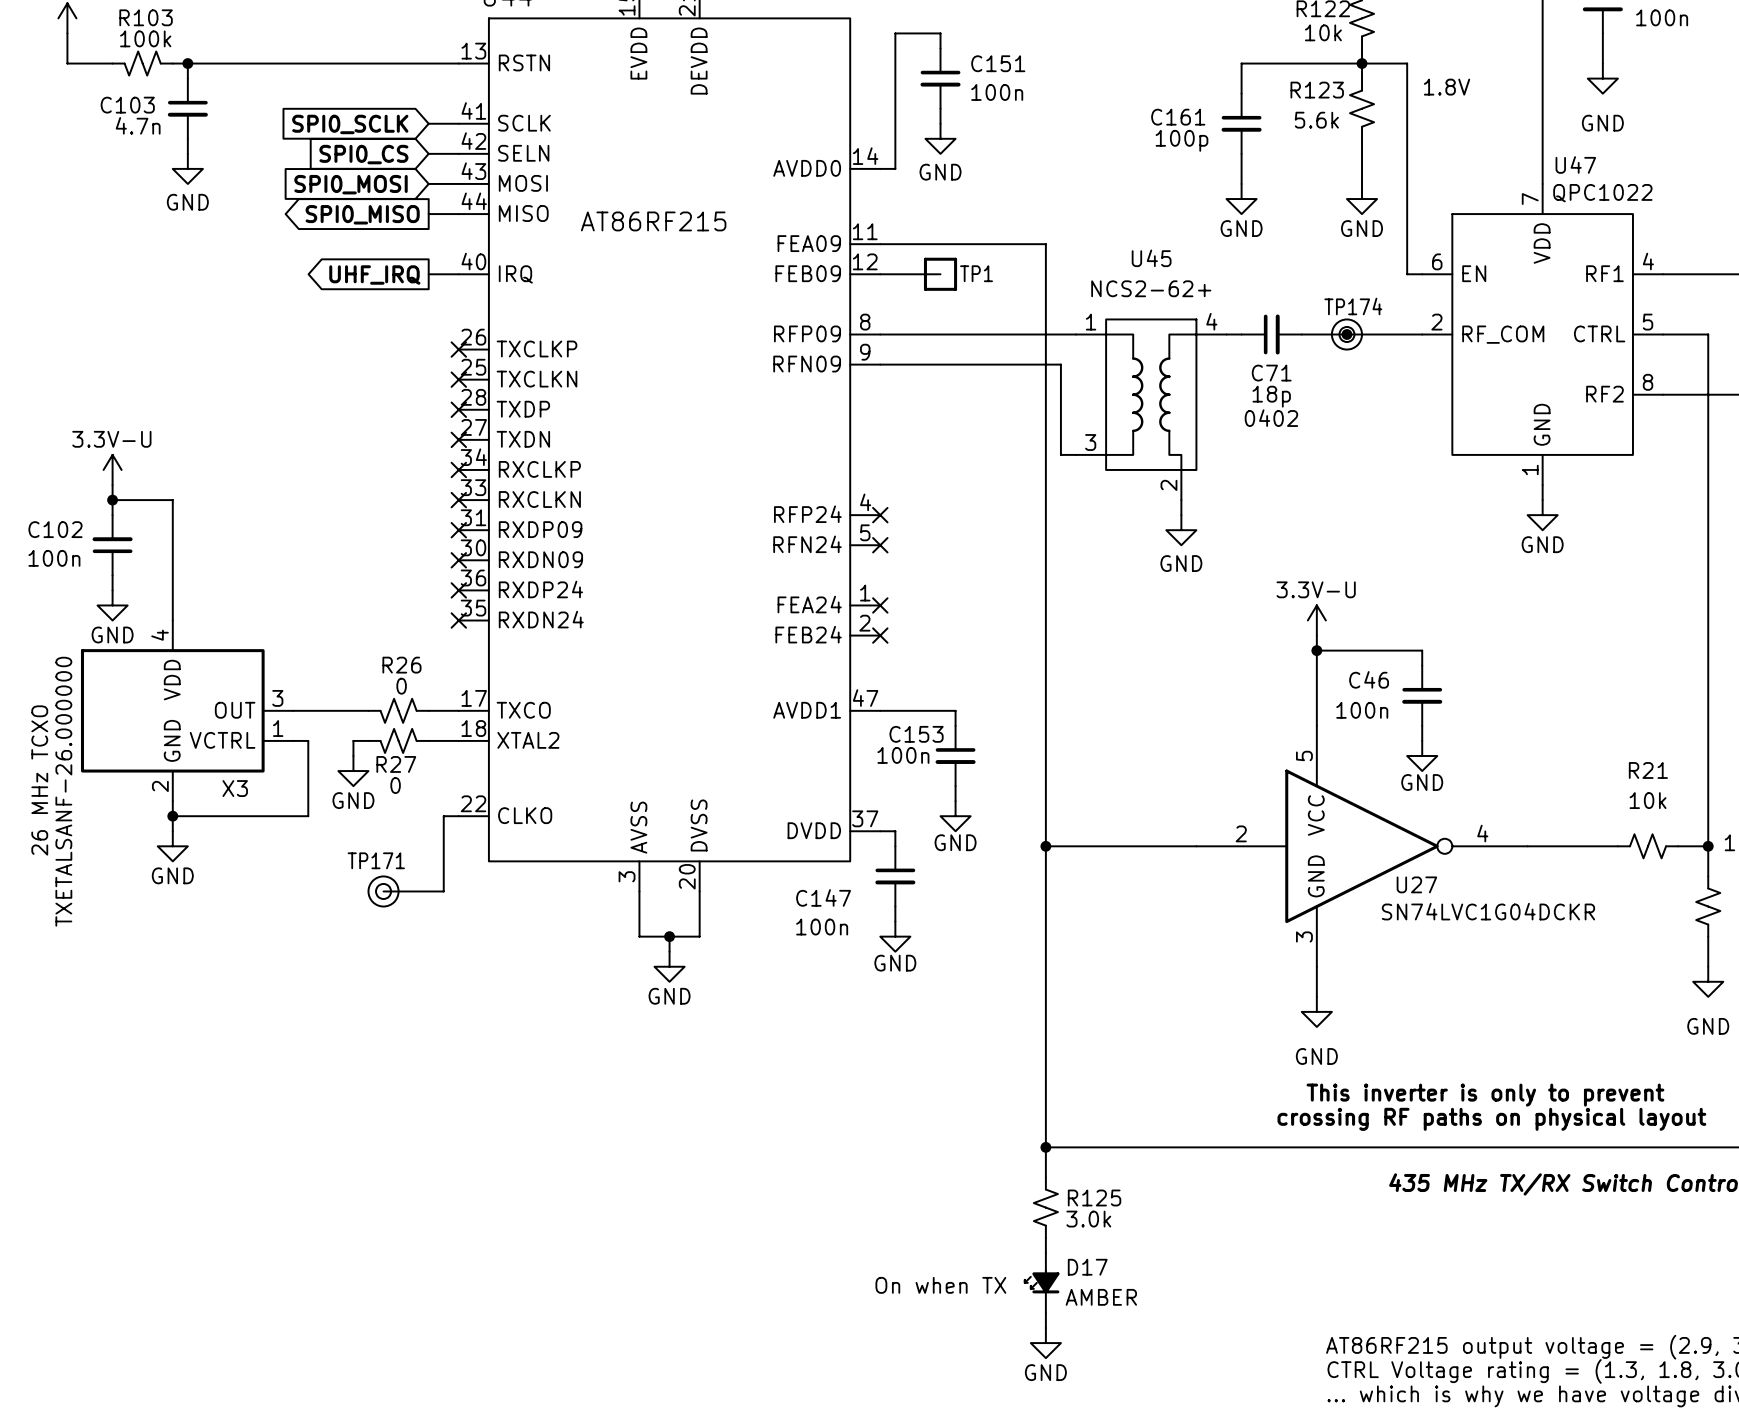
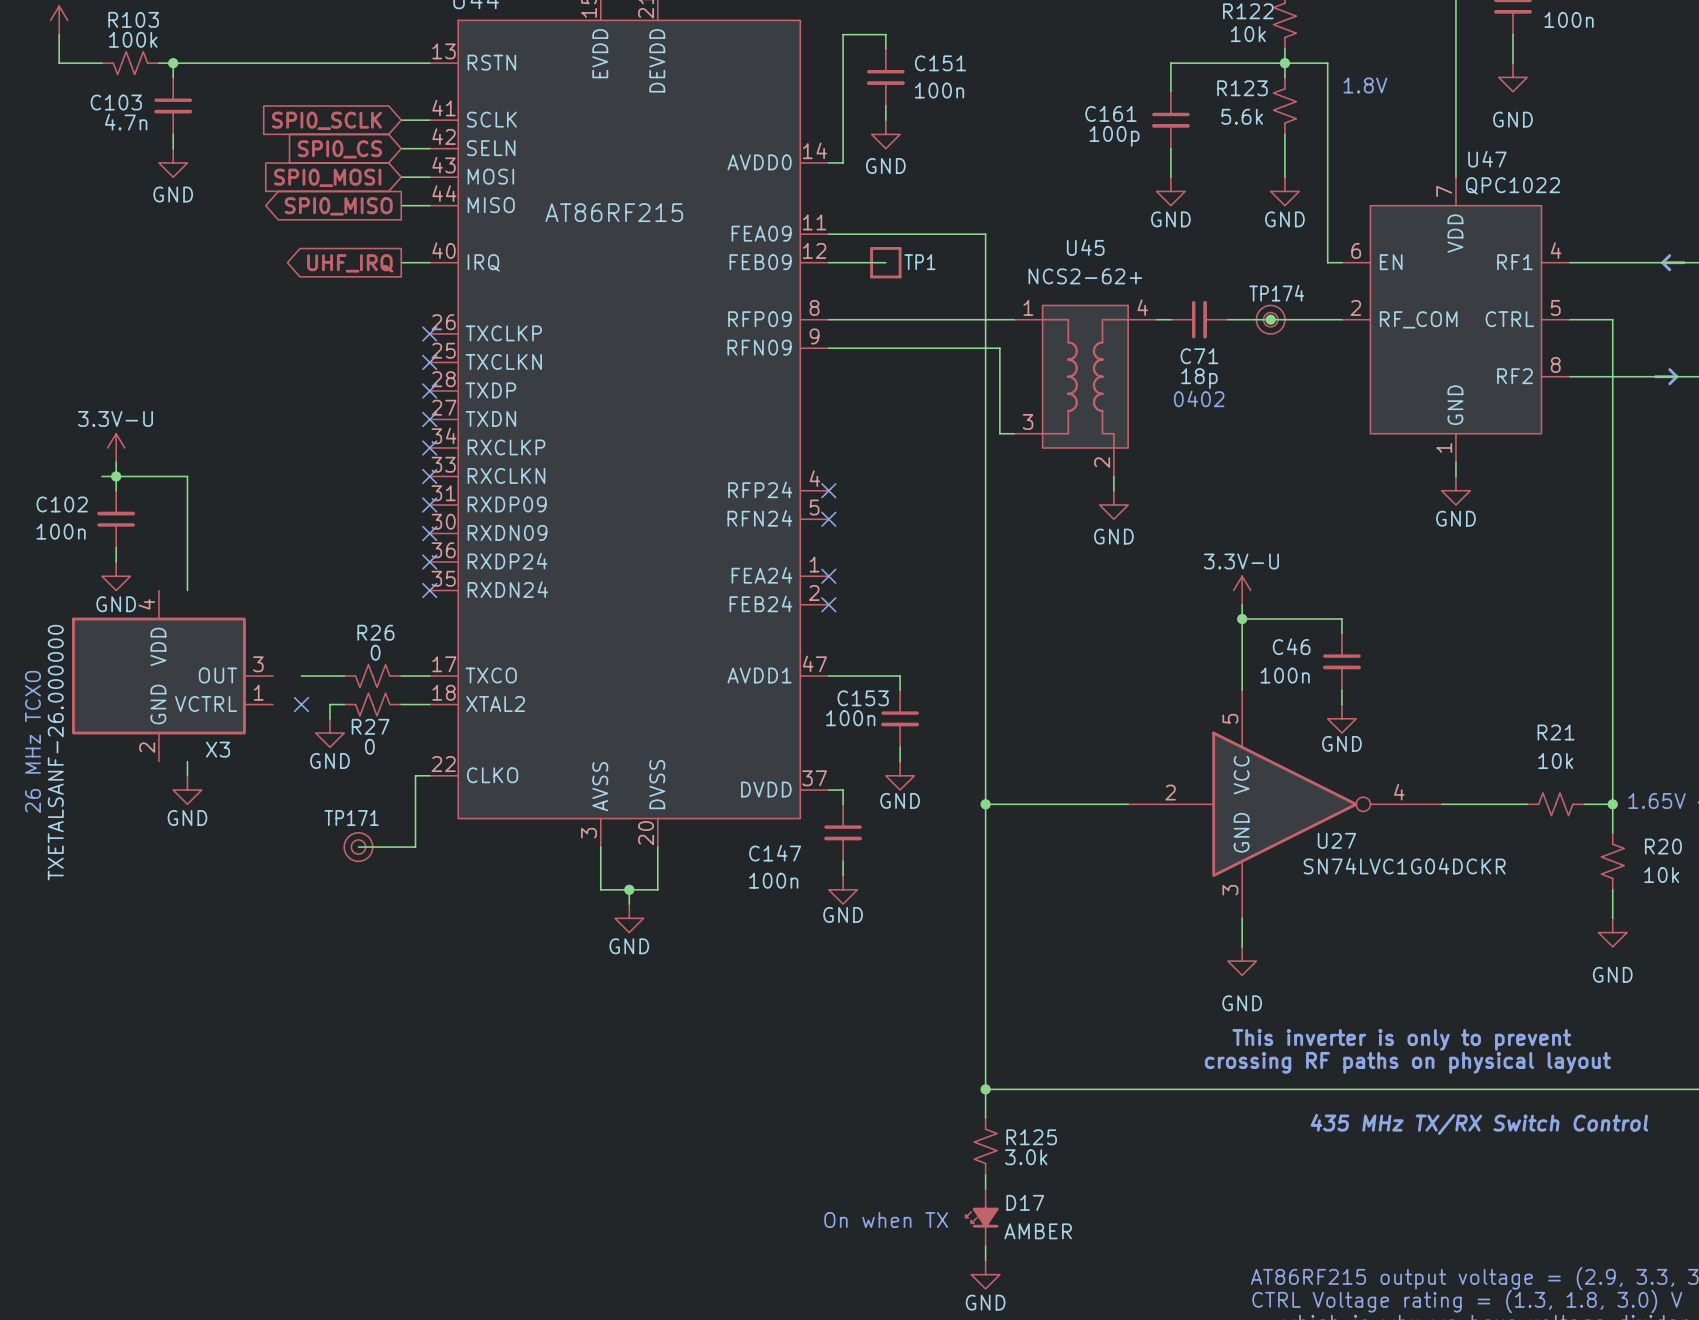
power symbol position: 3.3V-U (112, 469) -> 3.3V-U (116, 447)
wire: (112, 485) (112, 515) -> (116, 462) (116, 490)
junction position: (112, 500) -> (116, 476)
wire: (172, 500) (172, 620) -> (158, 476) (187, 476) (187, 590)
C102 position: (112, 545) -> (116, 519)
wire: (112, 575) (112, 590) -> (116, 547) (116, 562)
power symbol position: GND (112, 605) -> GND (116, 576)
wire: (293, 710) (323, 710) -> none
wire: (293, 740) (308, 740) (308, 816) (172, 816) -> none
no-connect mark: none -> (301, 704)
wire: (172, 801) (172, 831) -> none
wire: none -> (187, 761) (187, 775)
junction: (172, 816) -> none
power symbol position: GND (172, 846) -> GND (187, 790)

